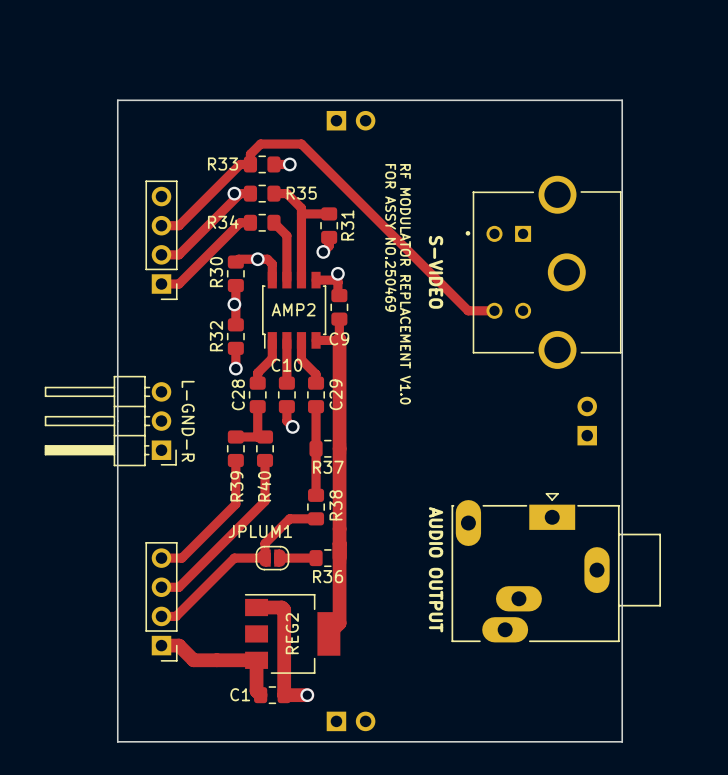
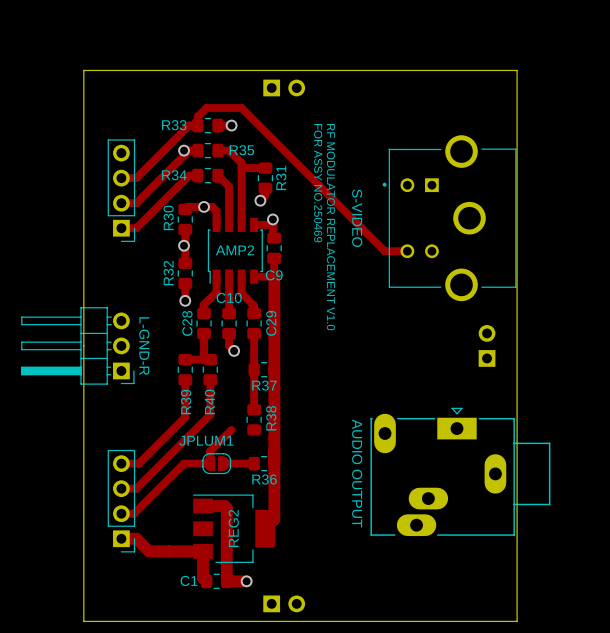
track: (289, 518) (316, 518) -> none

